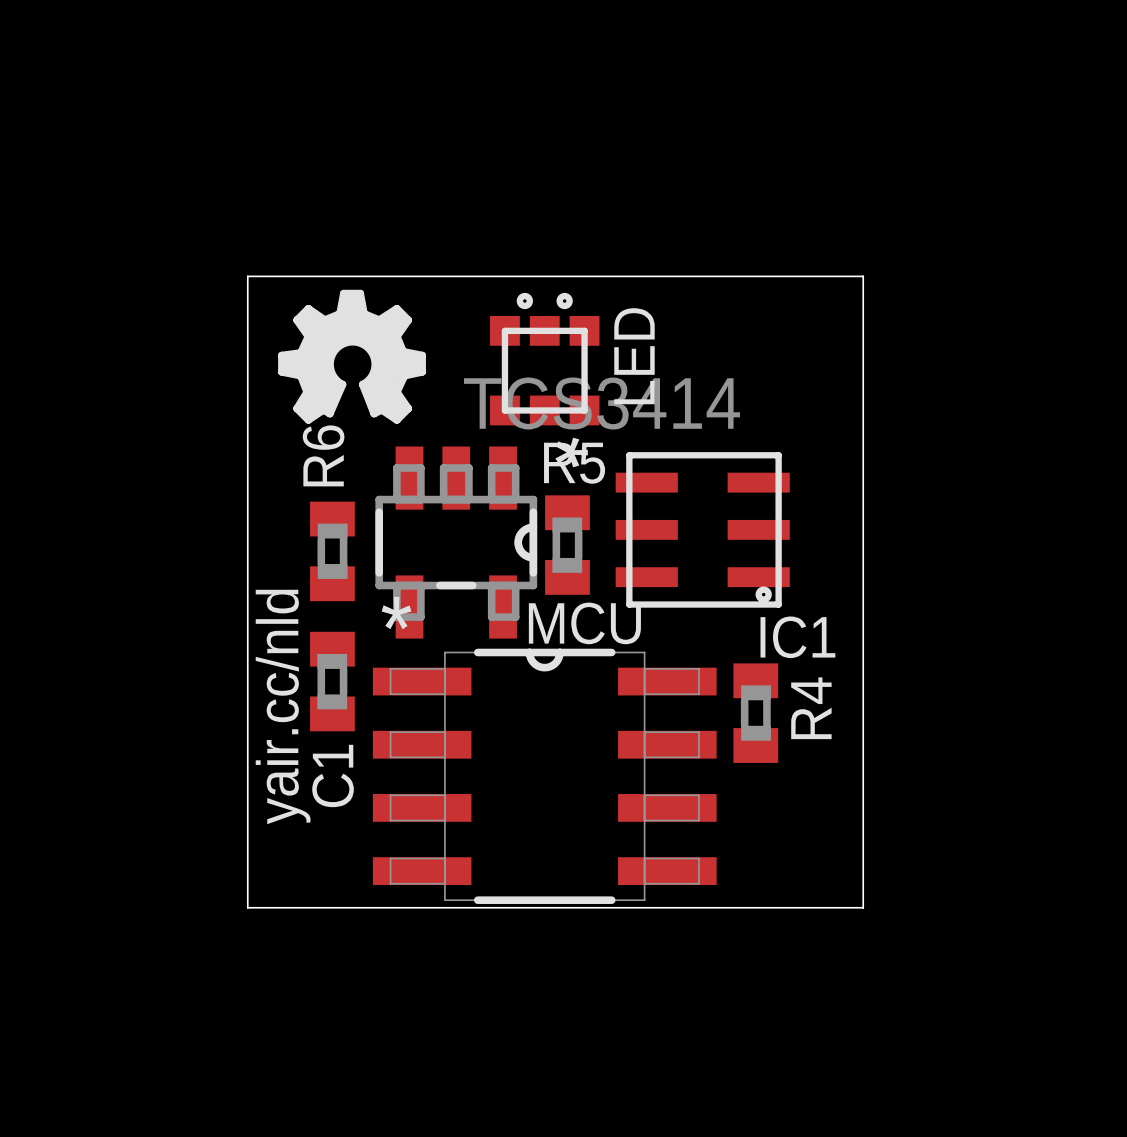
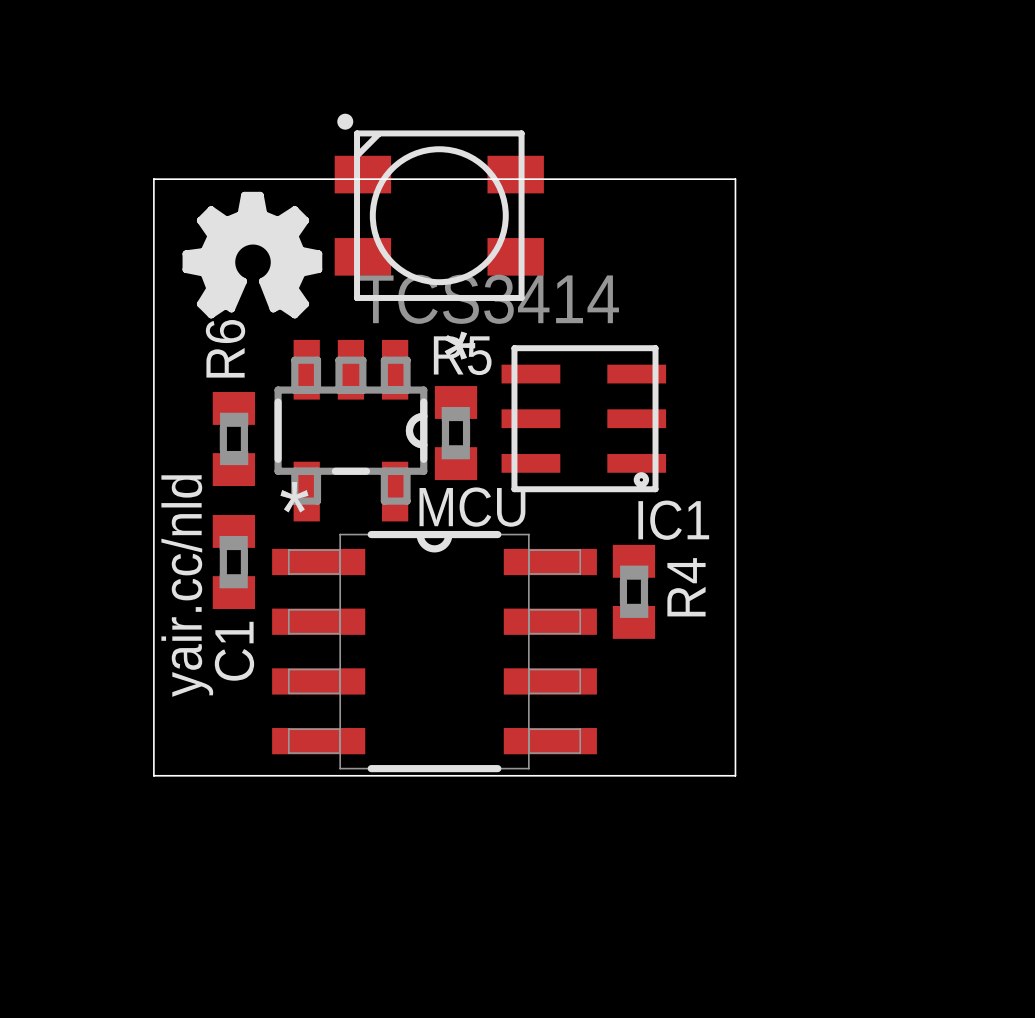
part: none -> (439, 207)
text: LED (634, 356) -> none
part: (544, 359) -> none

